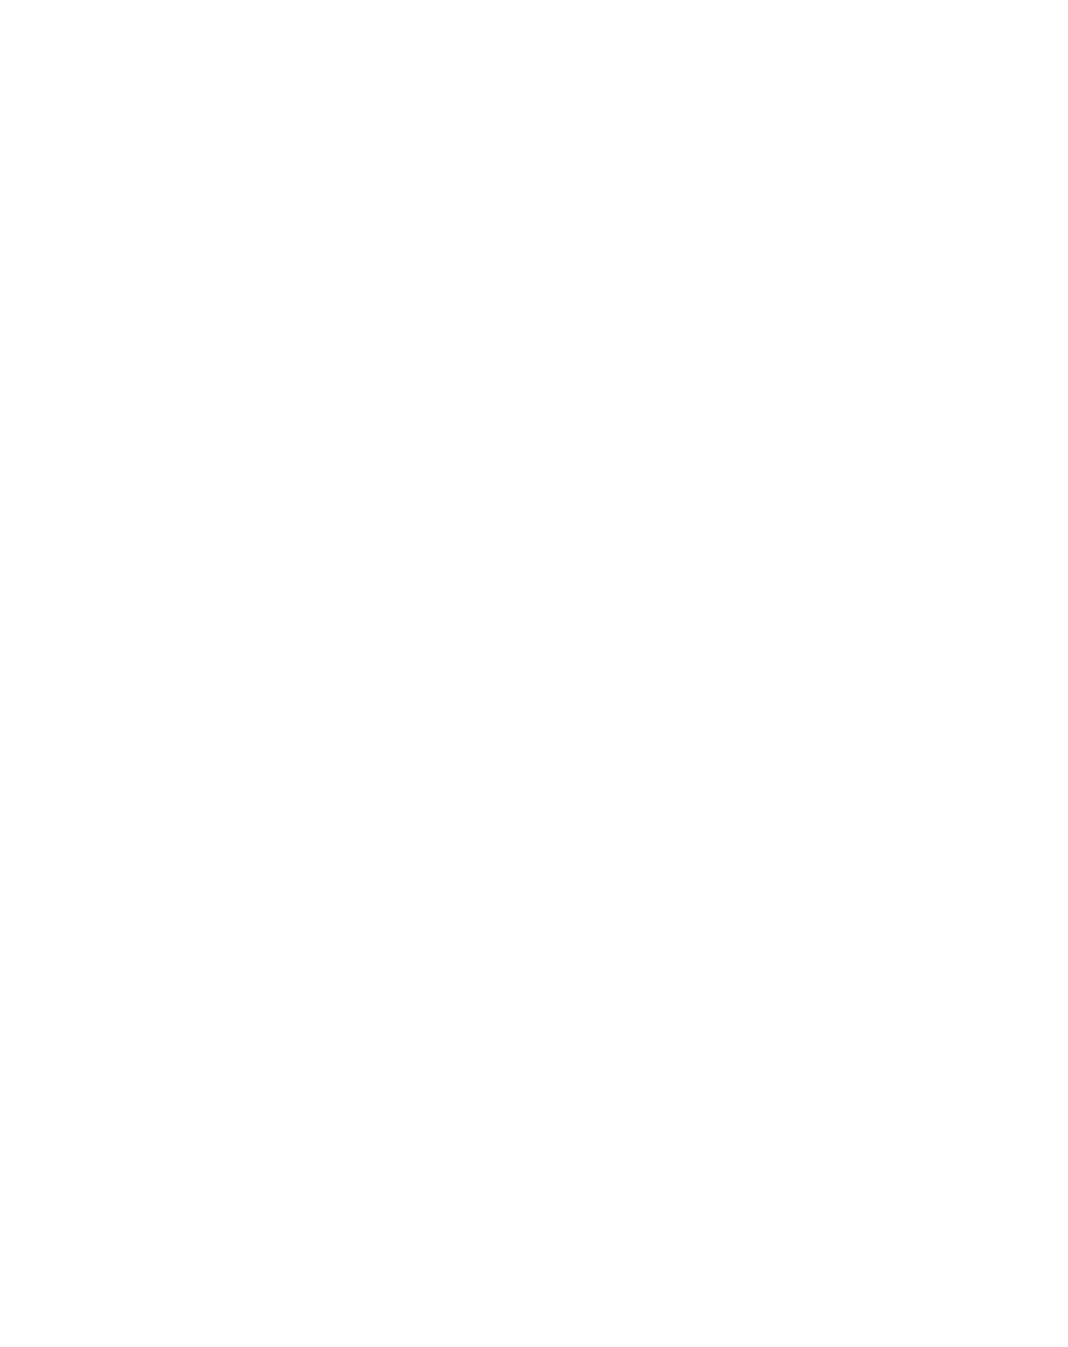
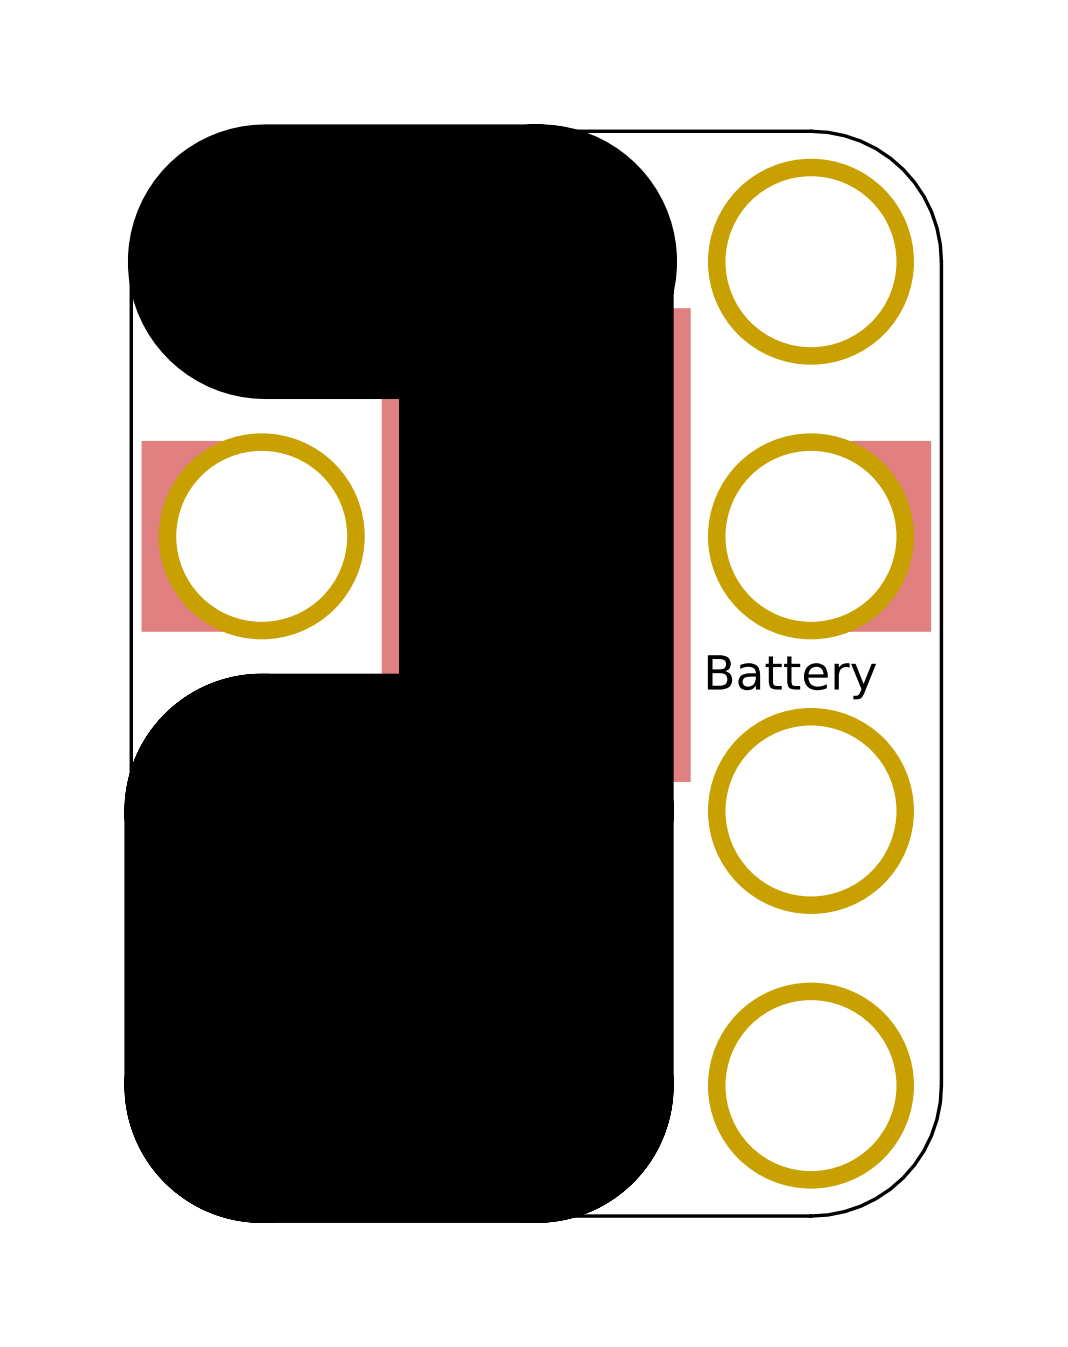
part: none -> Battery (533, 673)

